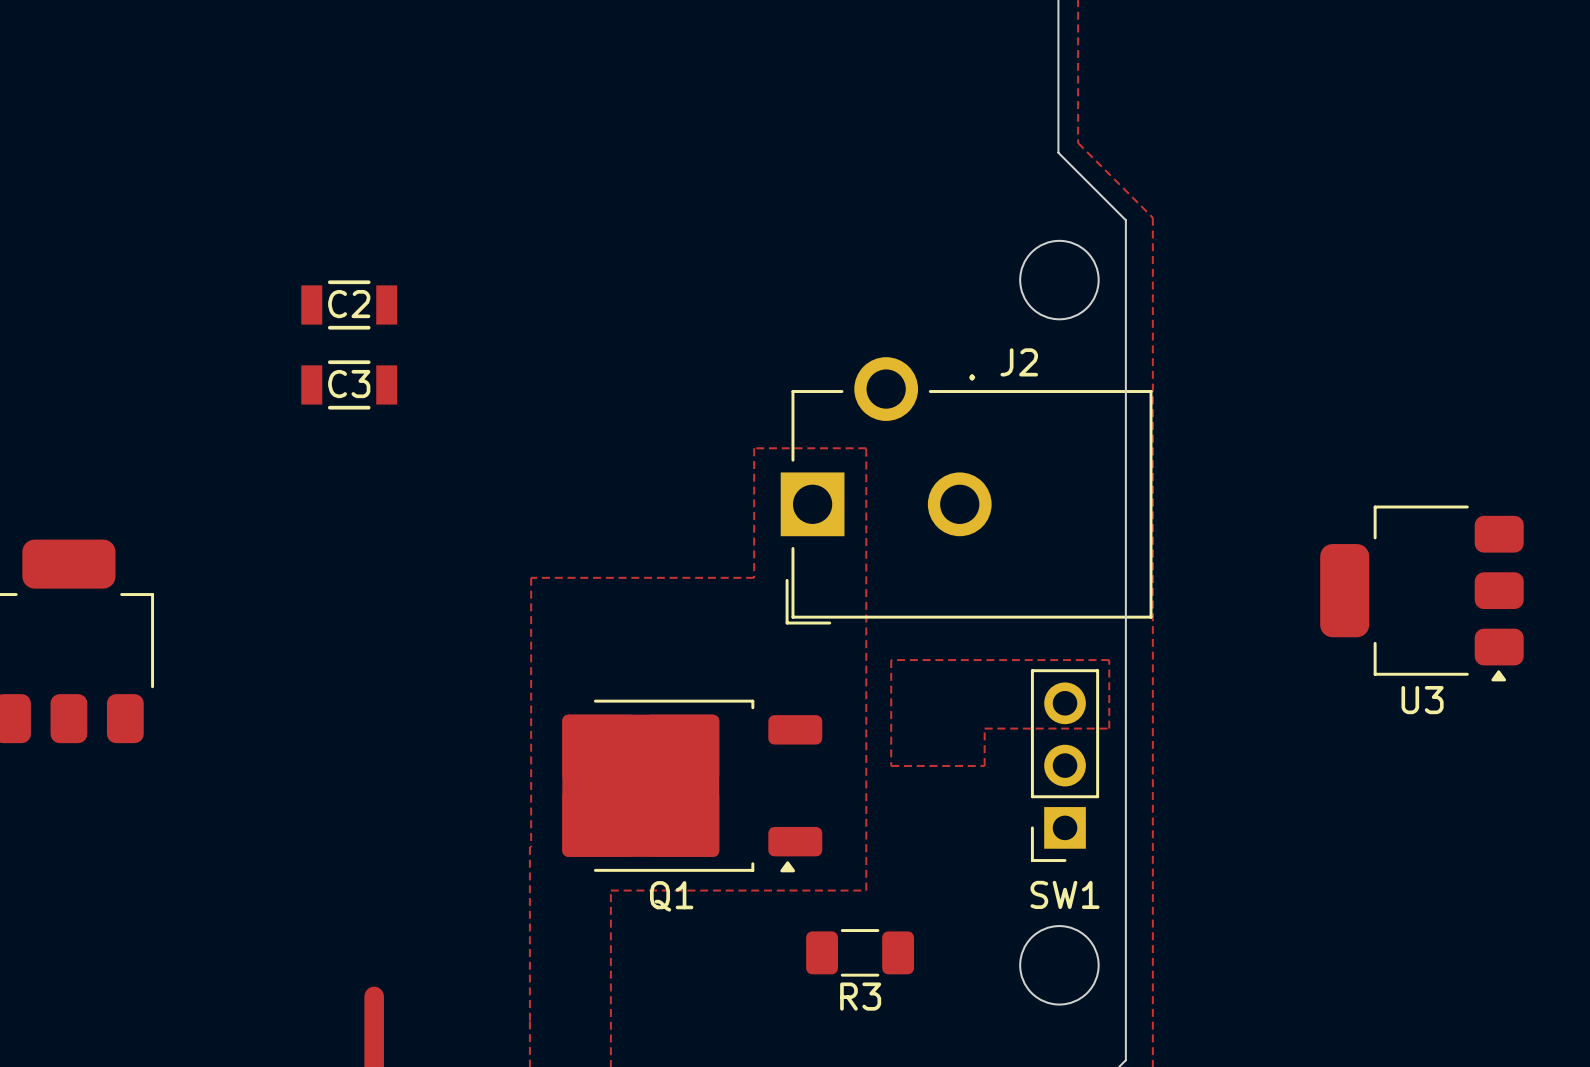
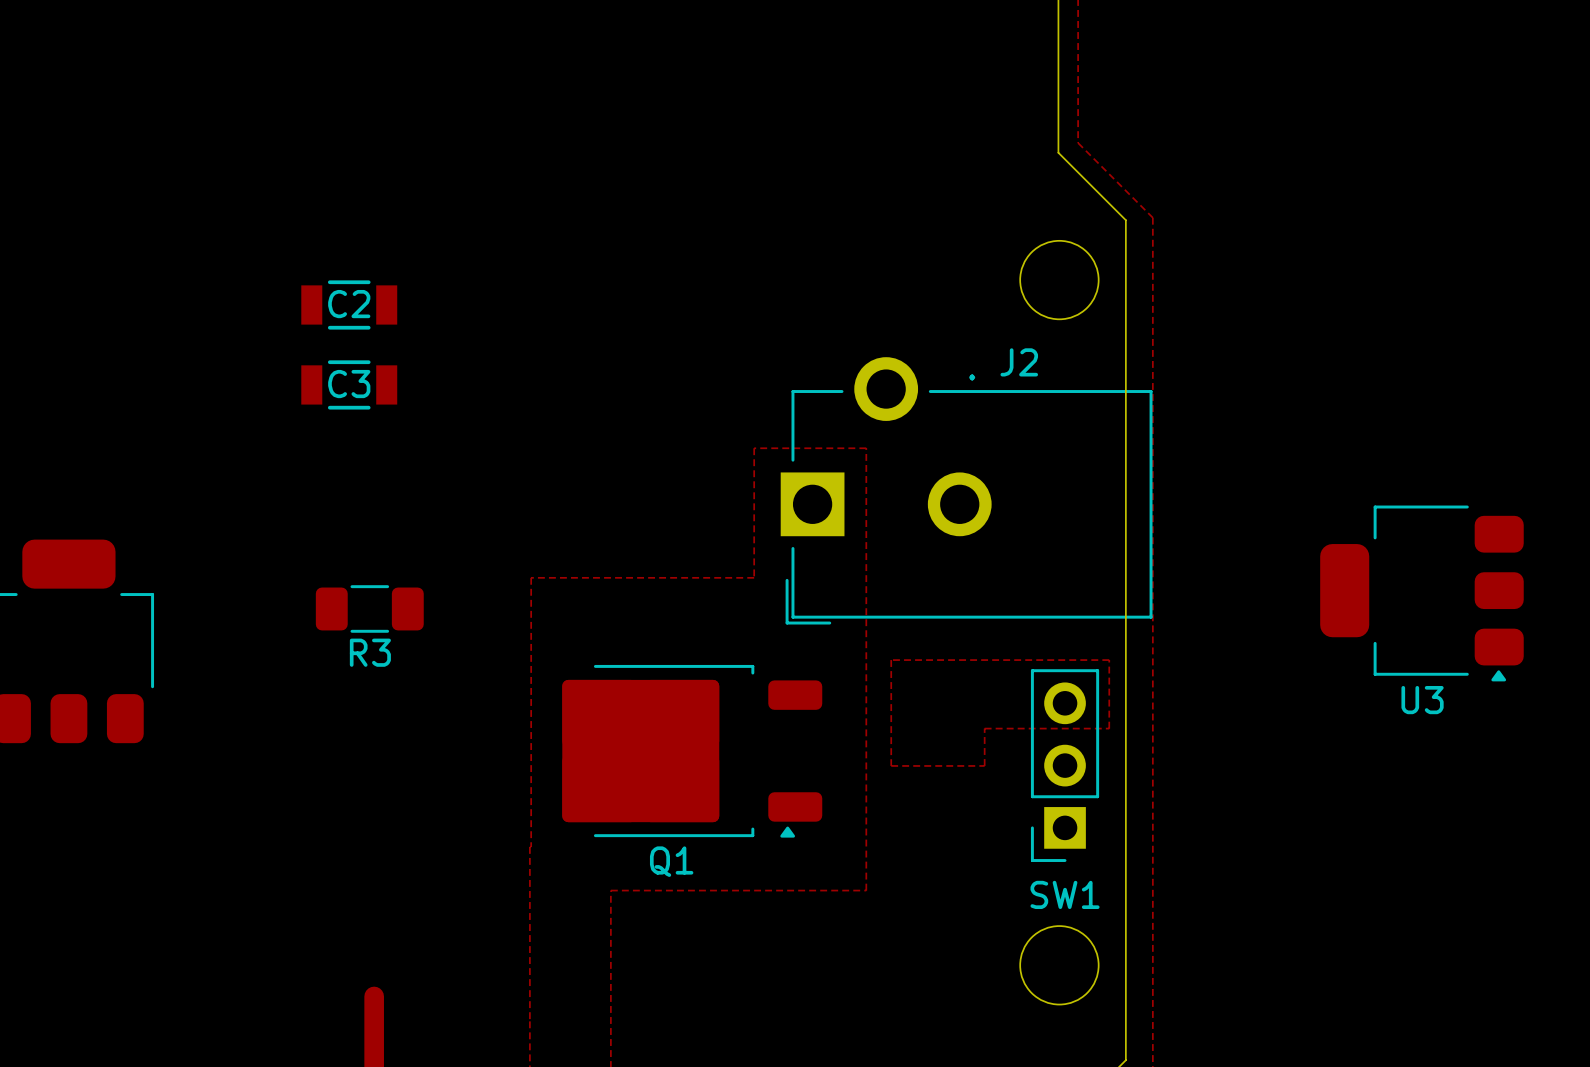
Q1 position: (692, 786) -> (692, 751)
R3 position: (860, 952) -> (369, 608)

